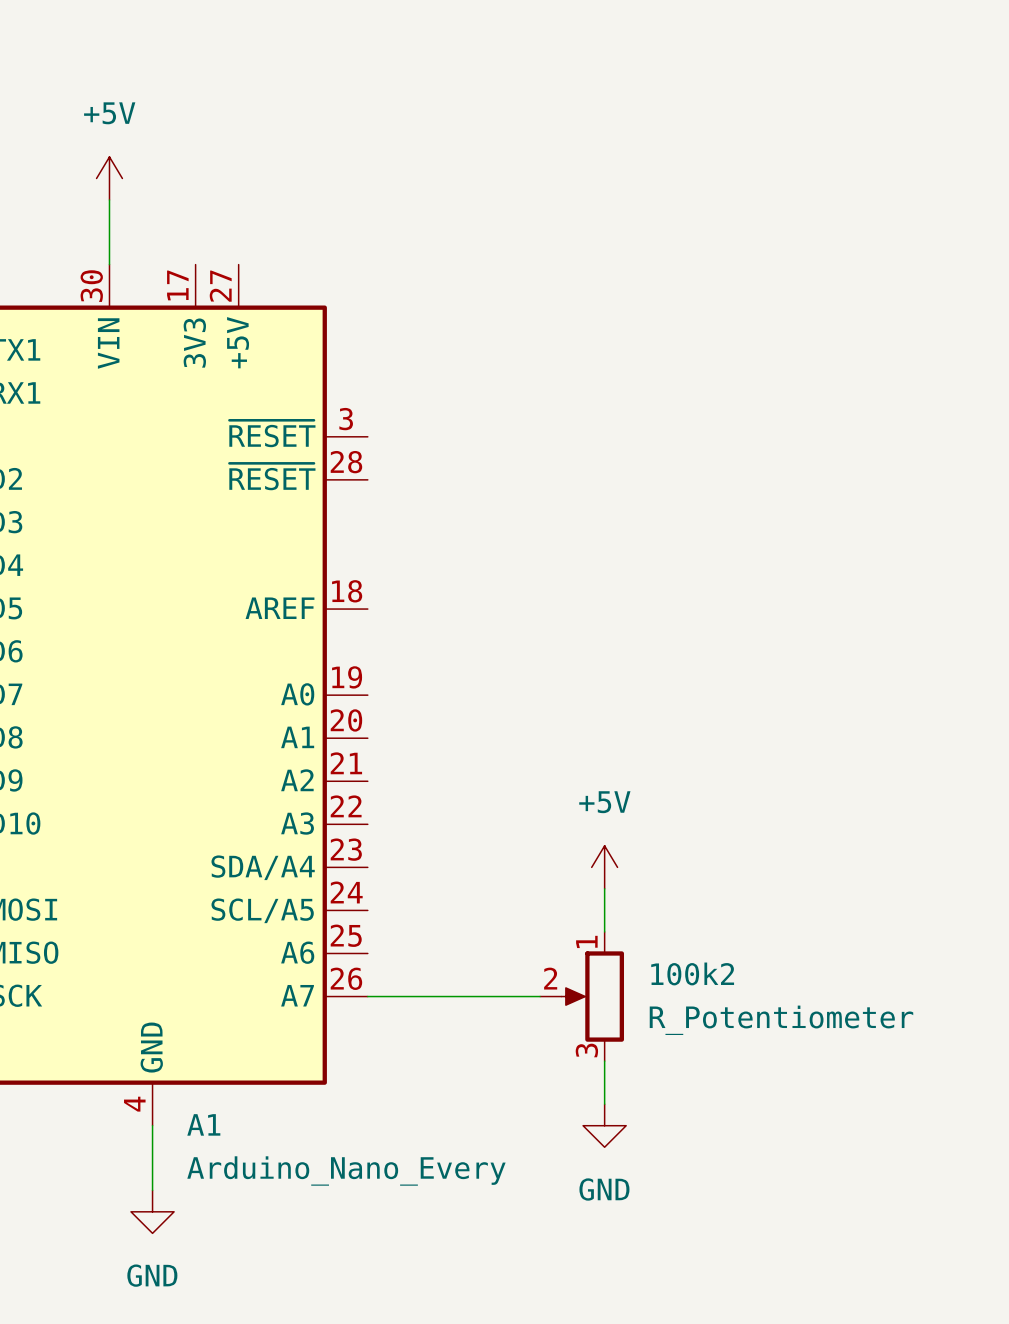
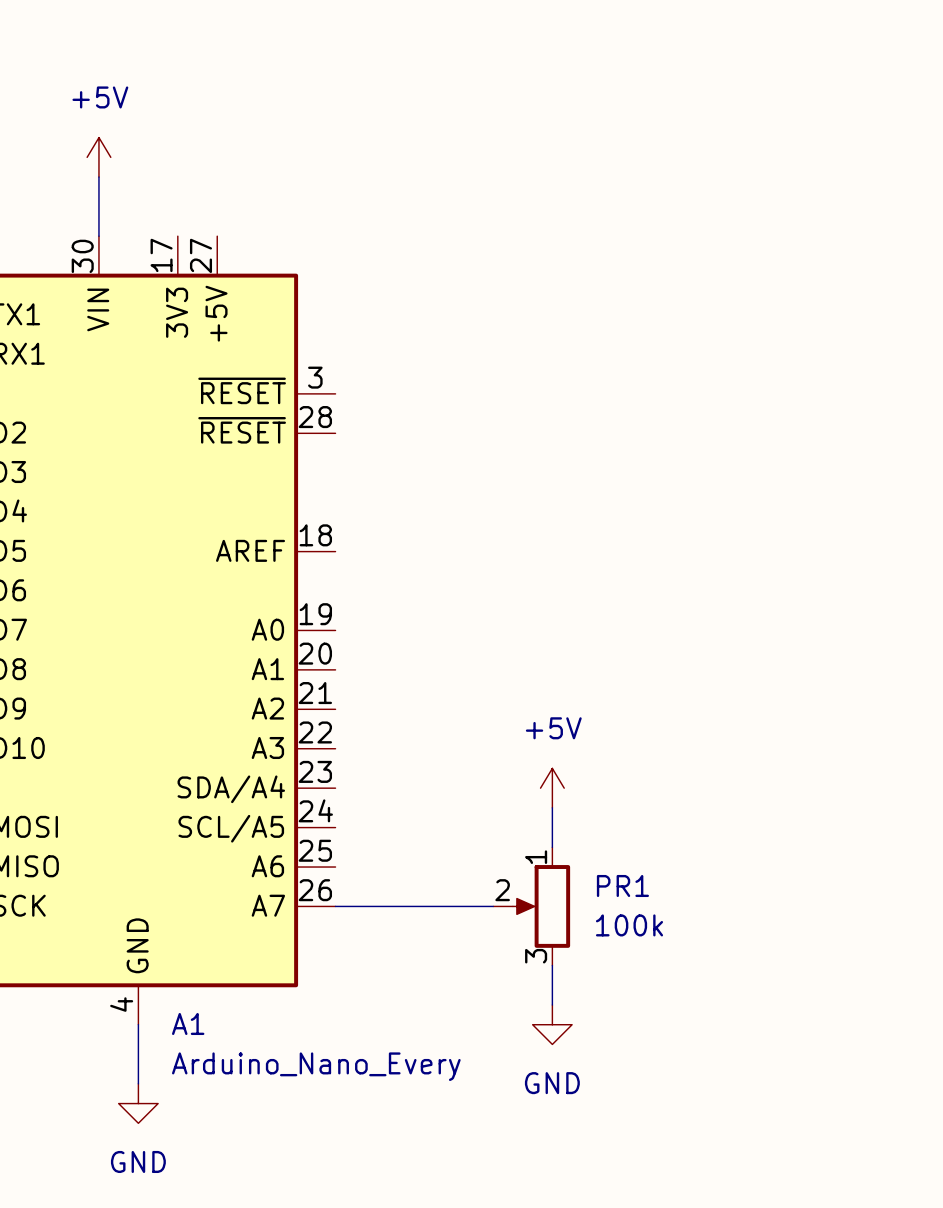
100k2 name: 100k2 (692, 973) -> PR1 (622, 885)
100k2 value: R_Potentiometer (781, 1020) -> 100k (629, 925)

